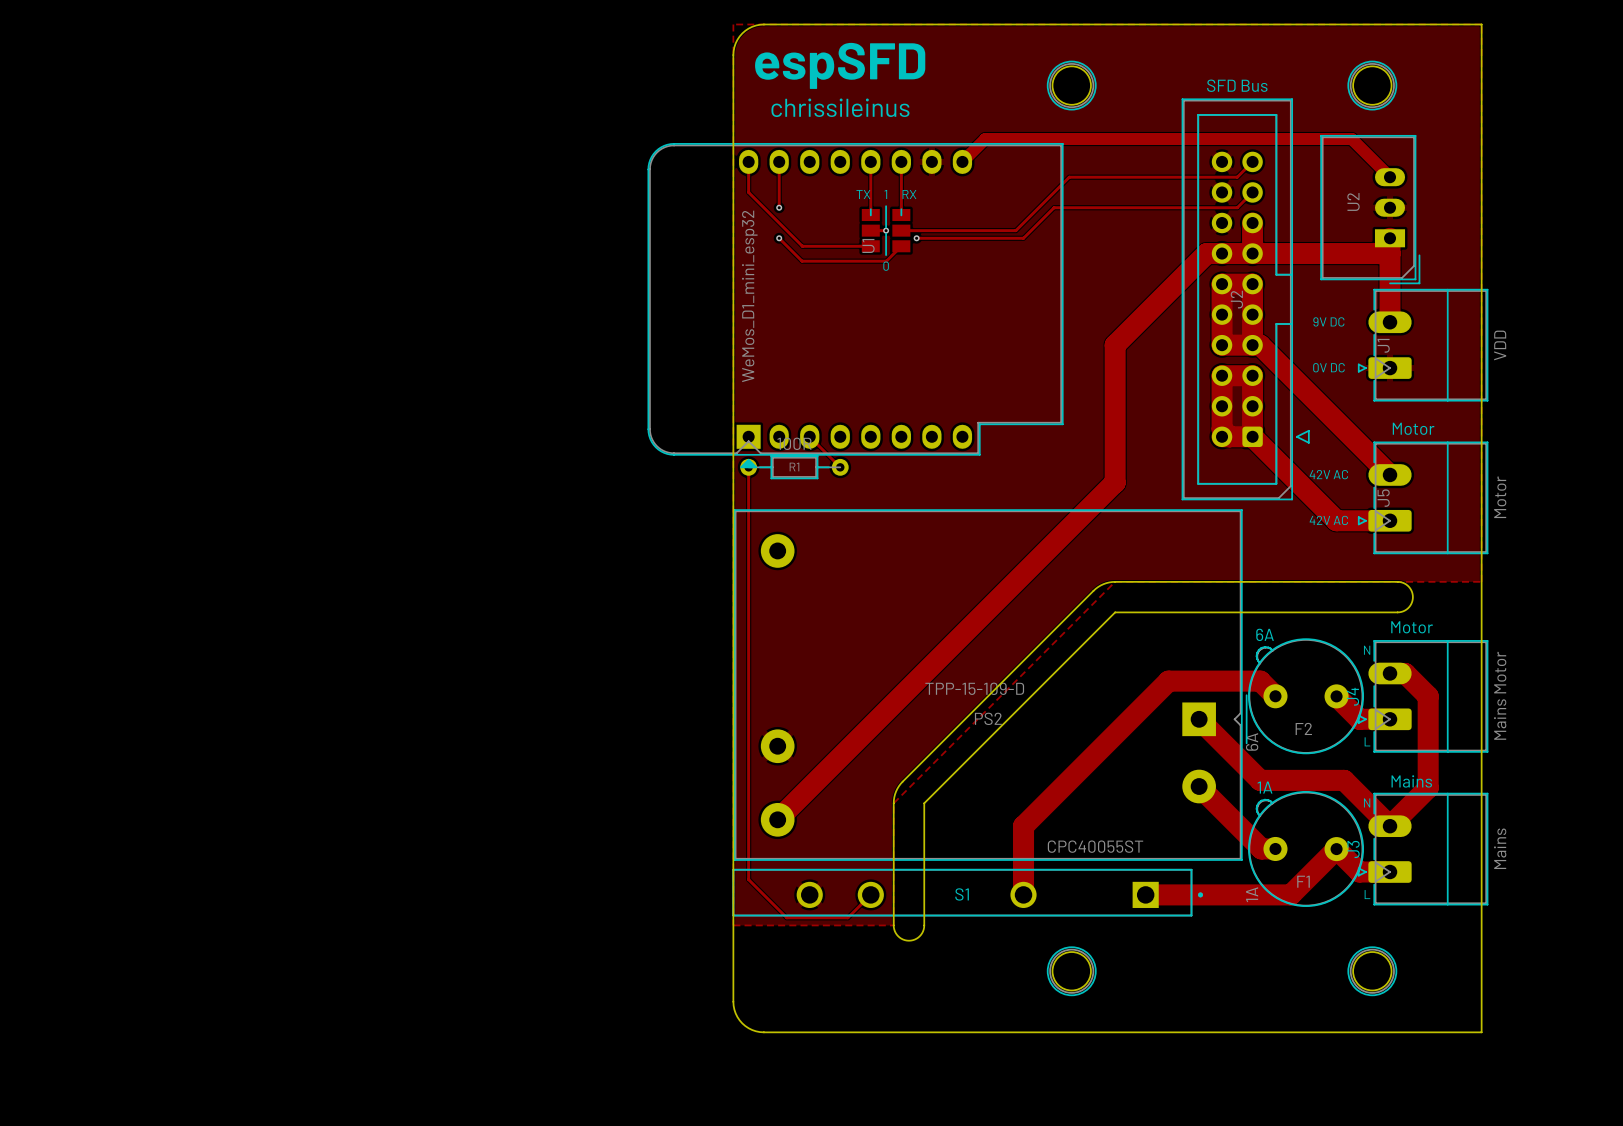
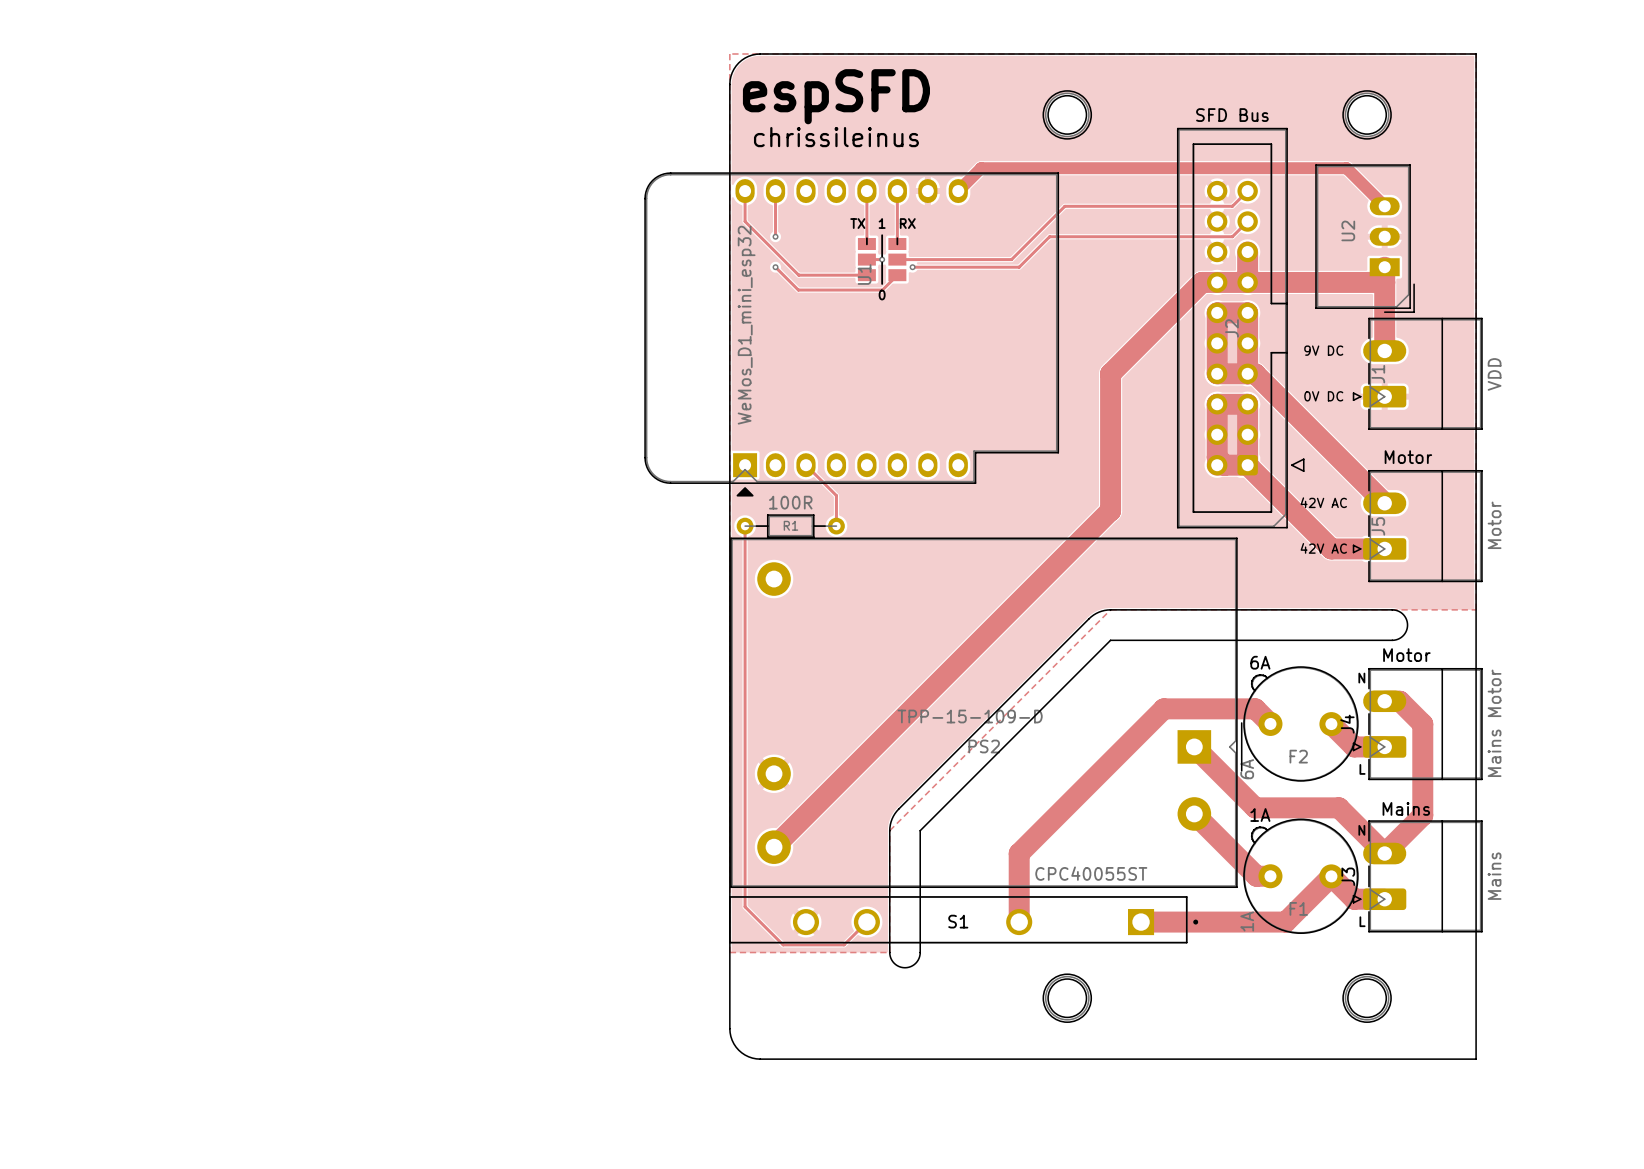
track: (748, 467) (748, 497) -> (836, 495) (836, 526)
R1 position: (794, 467) -> (790, 526)

